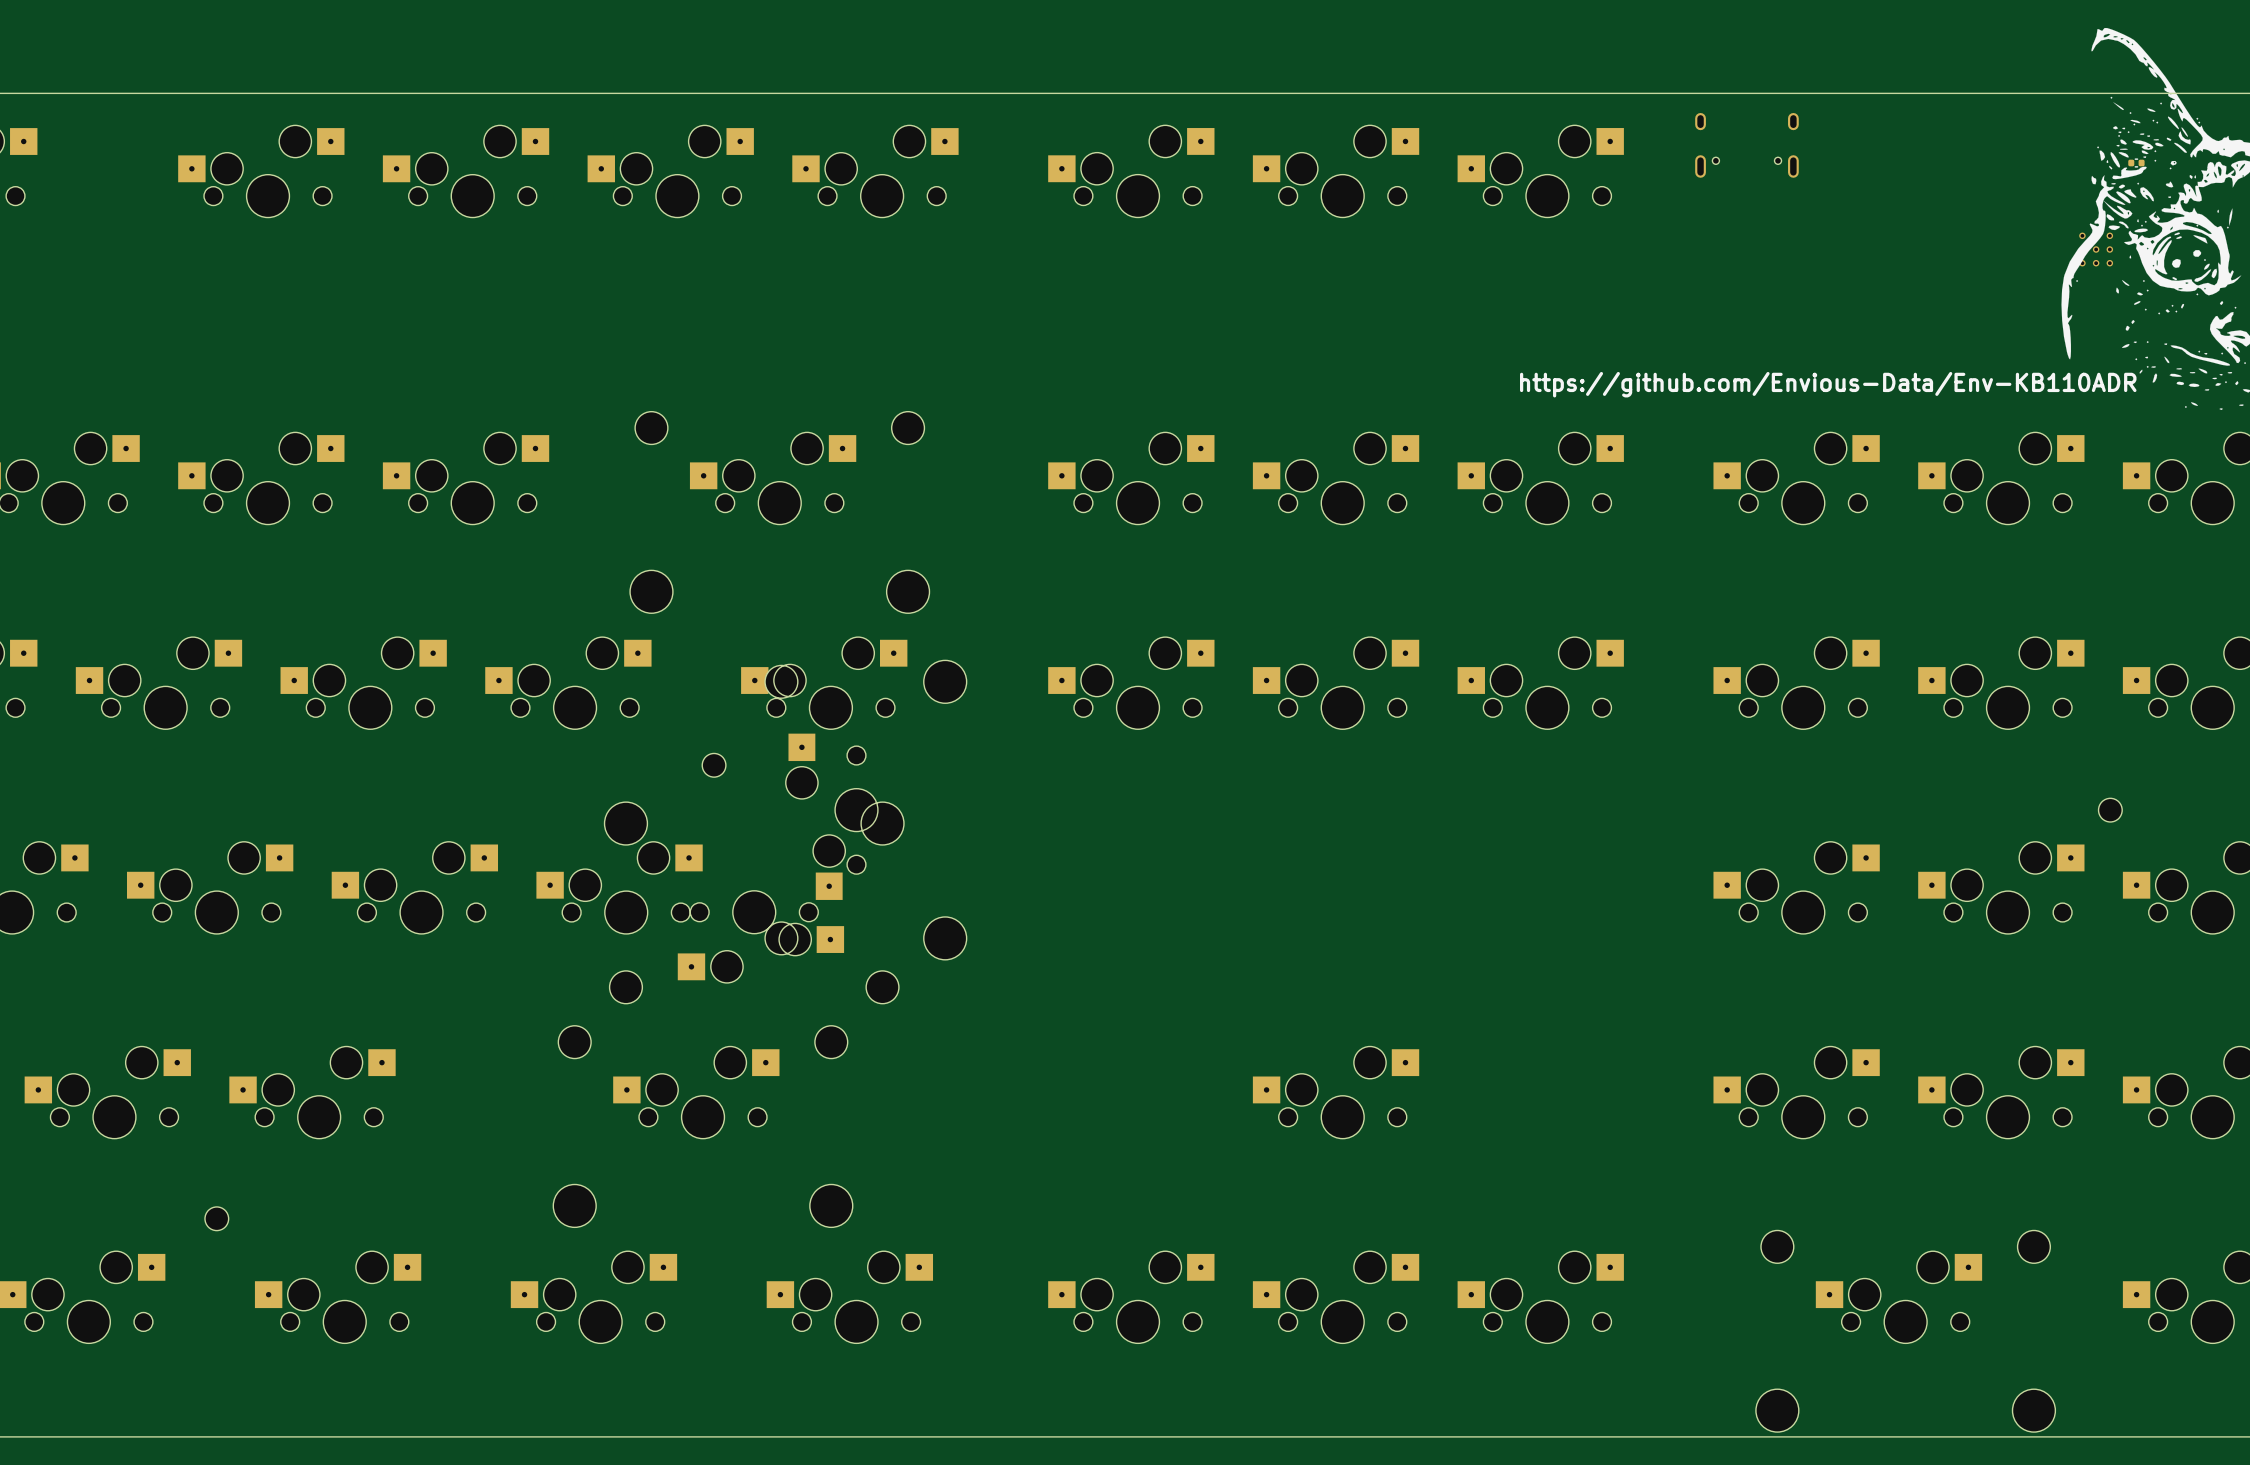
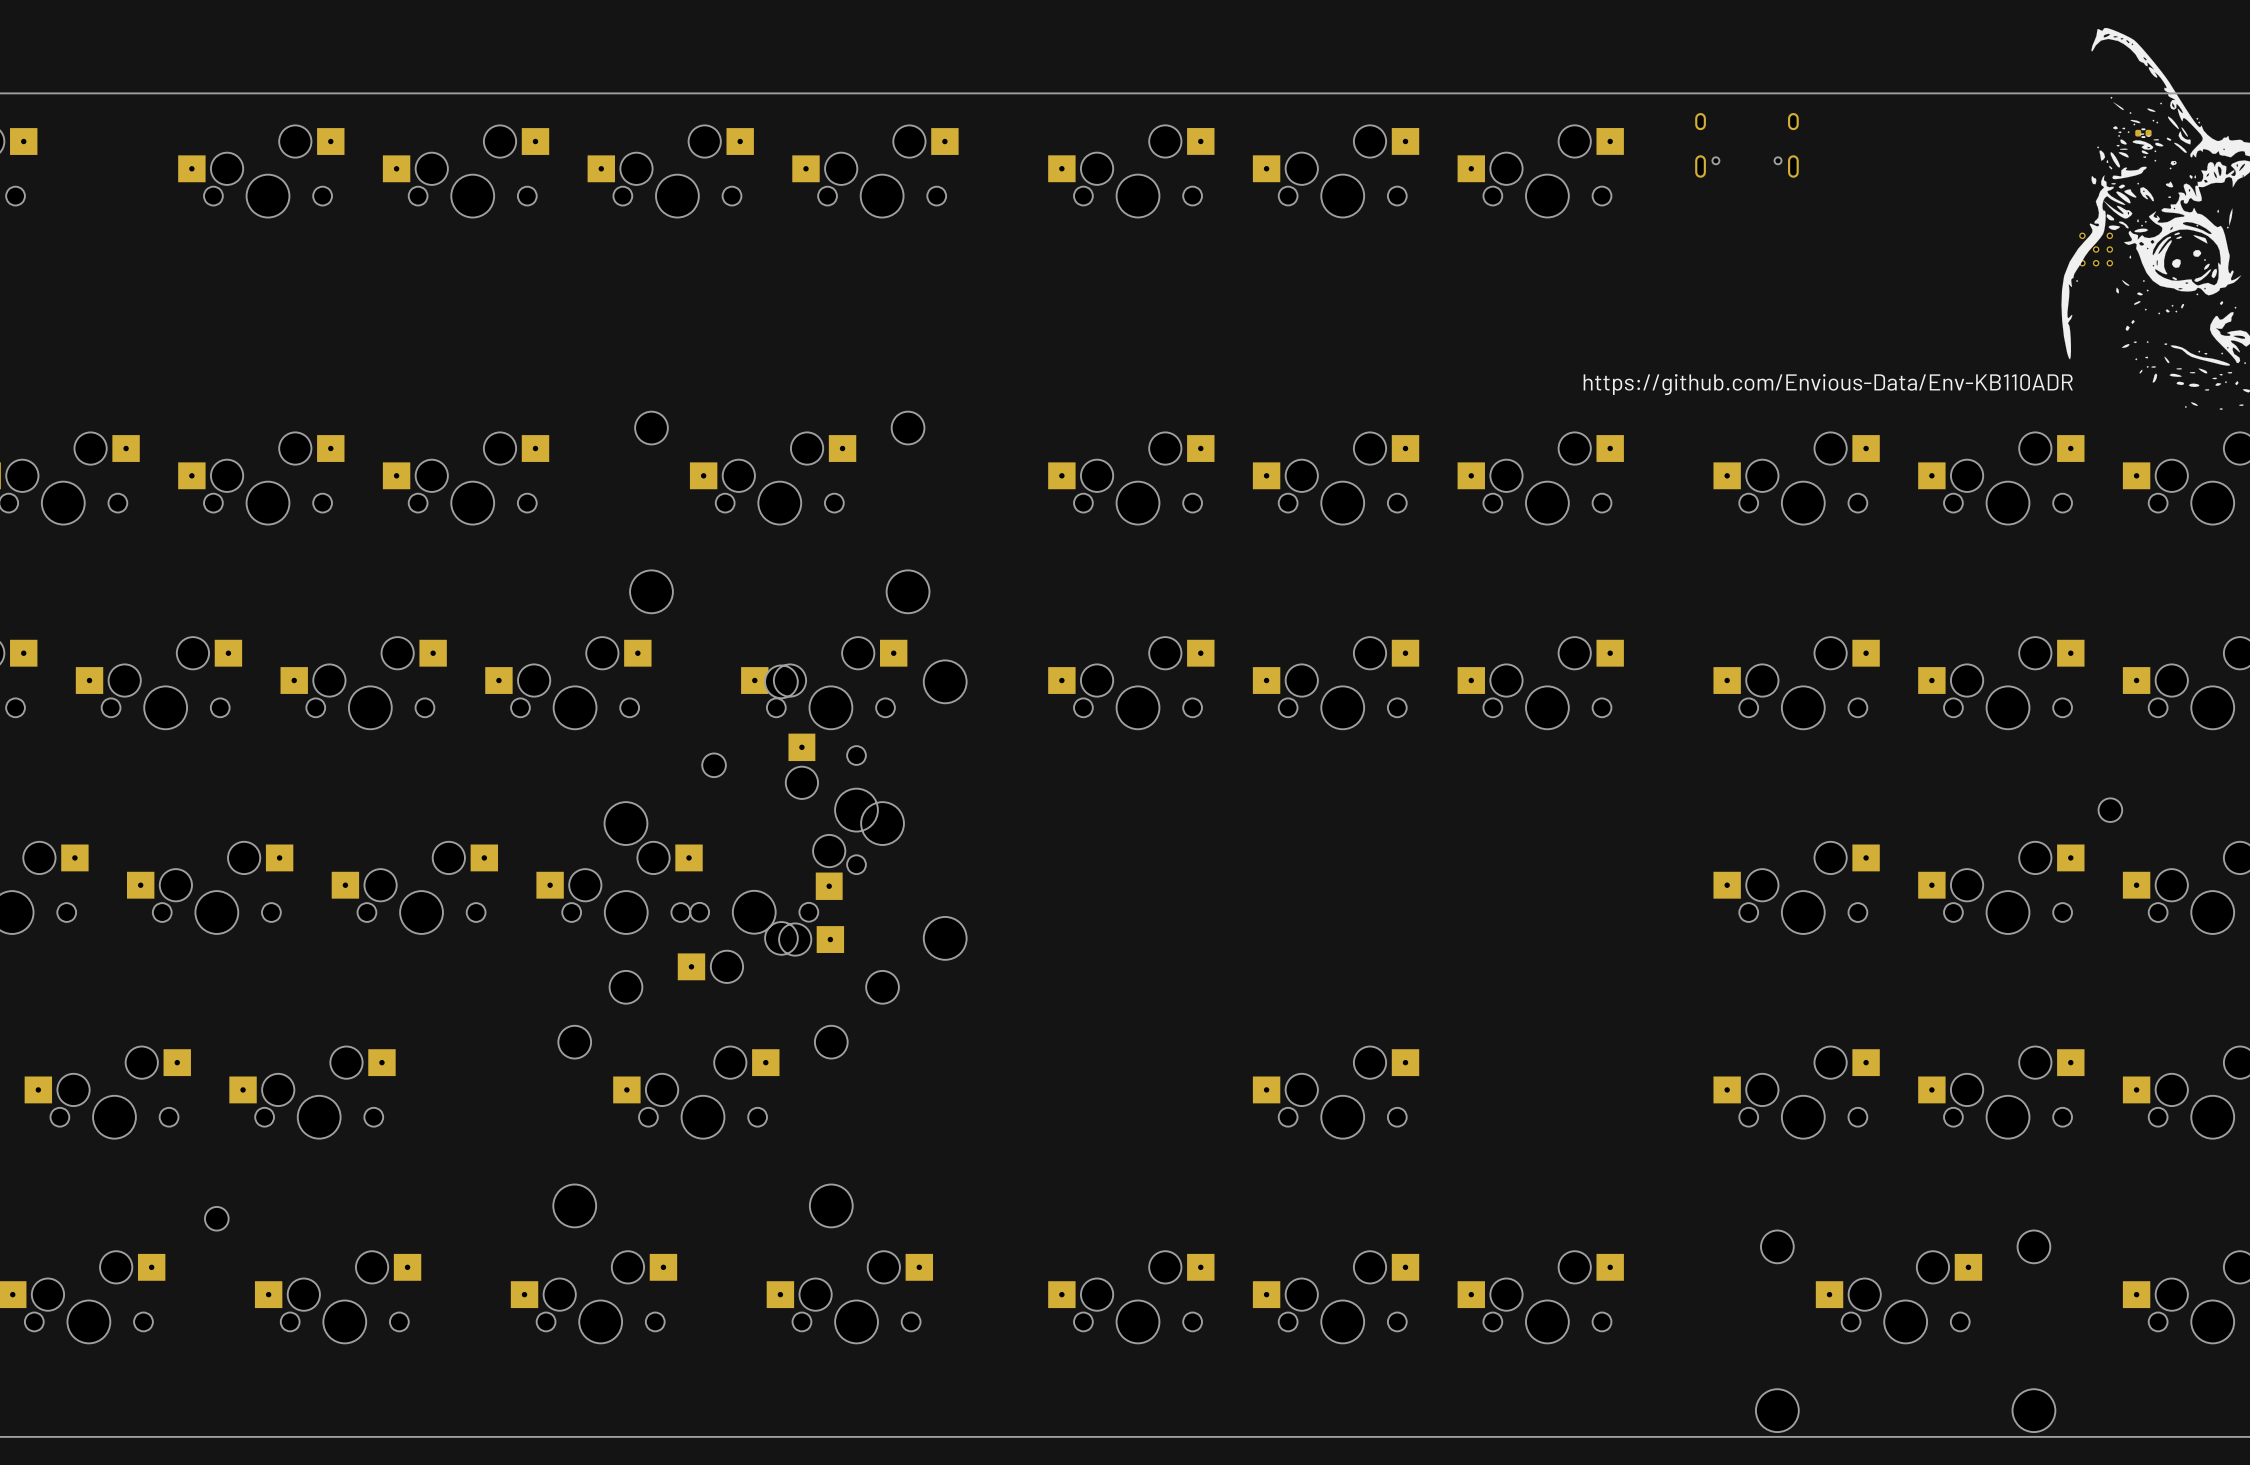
part position: (2136, 163) -> (2143, 133)

